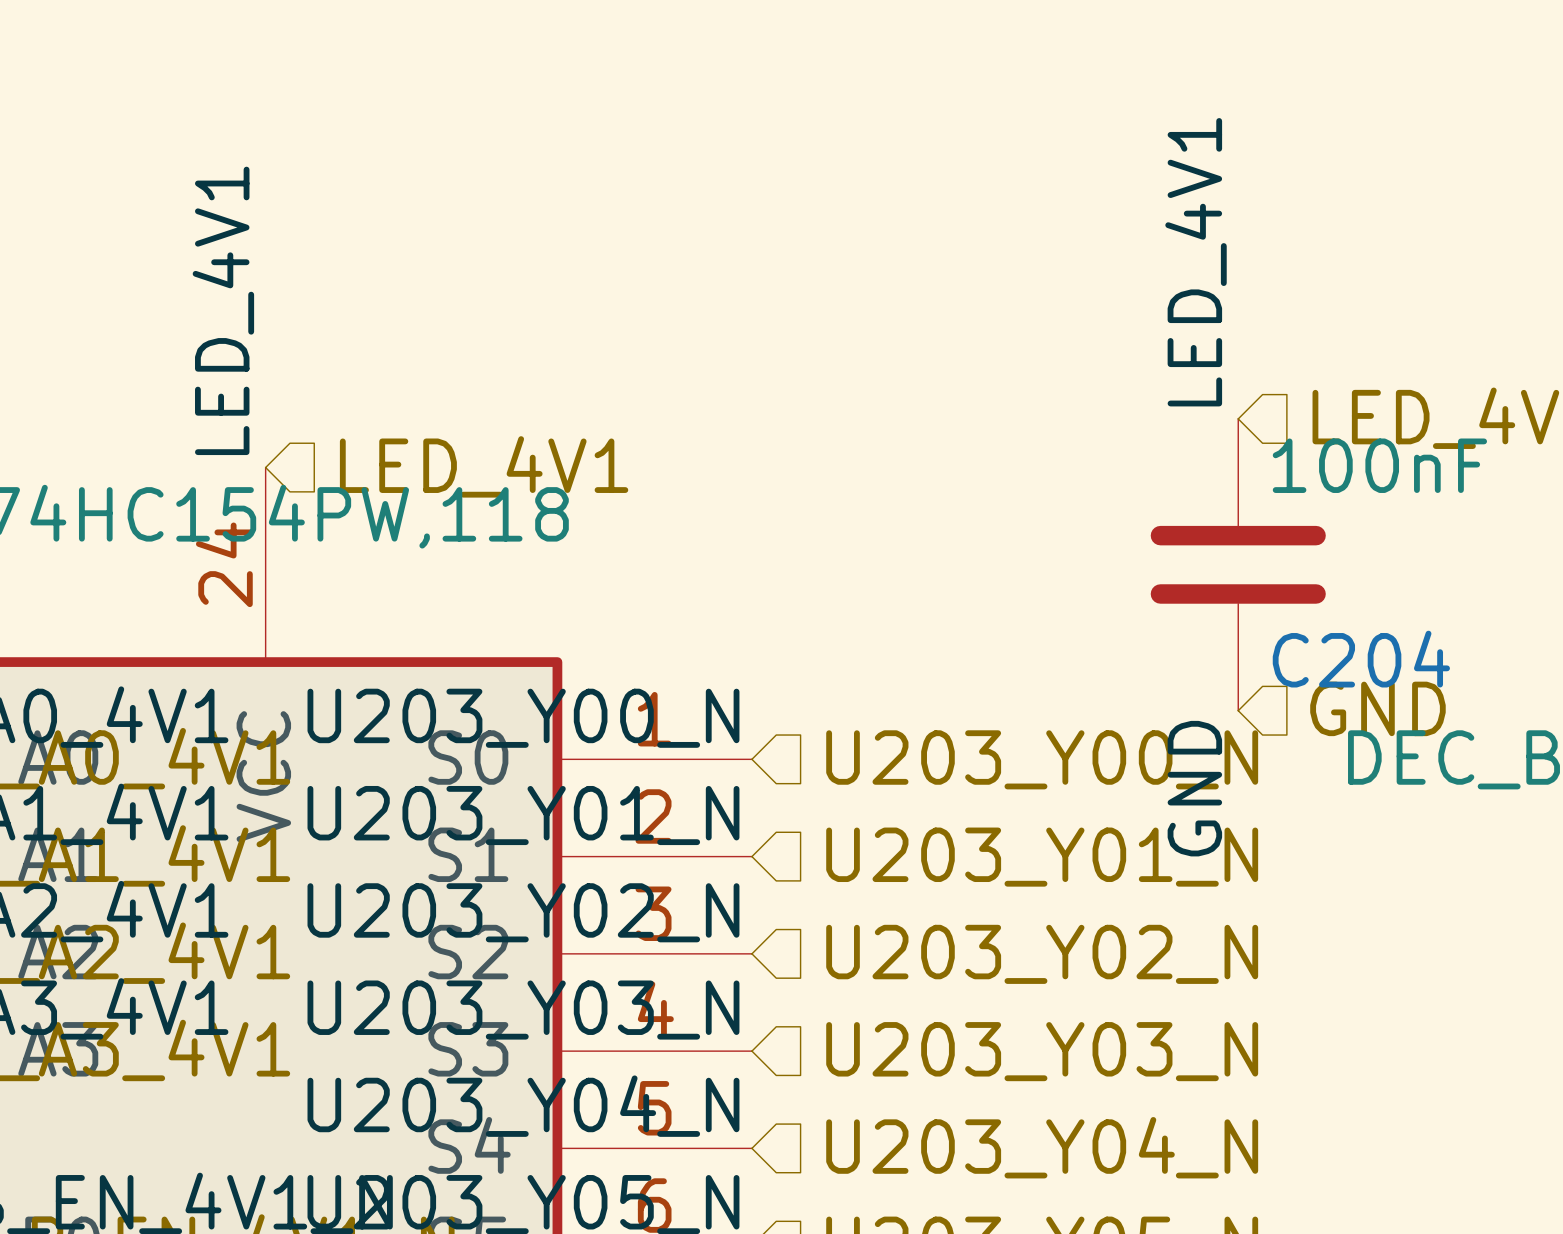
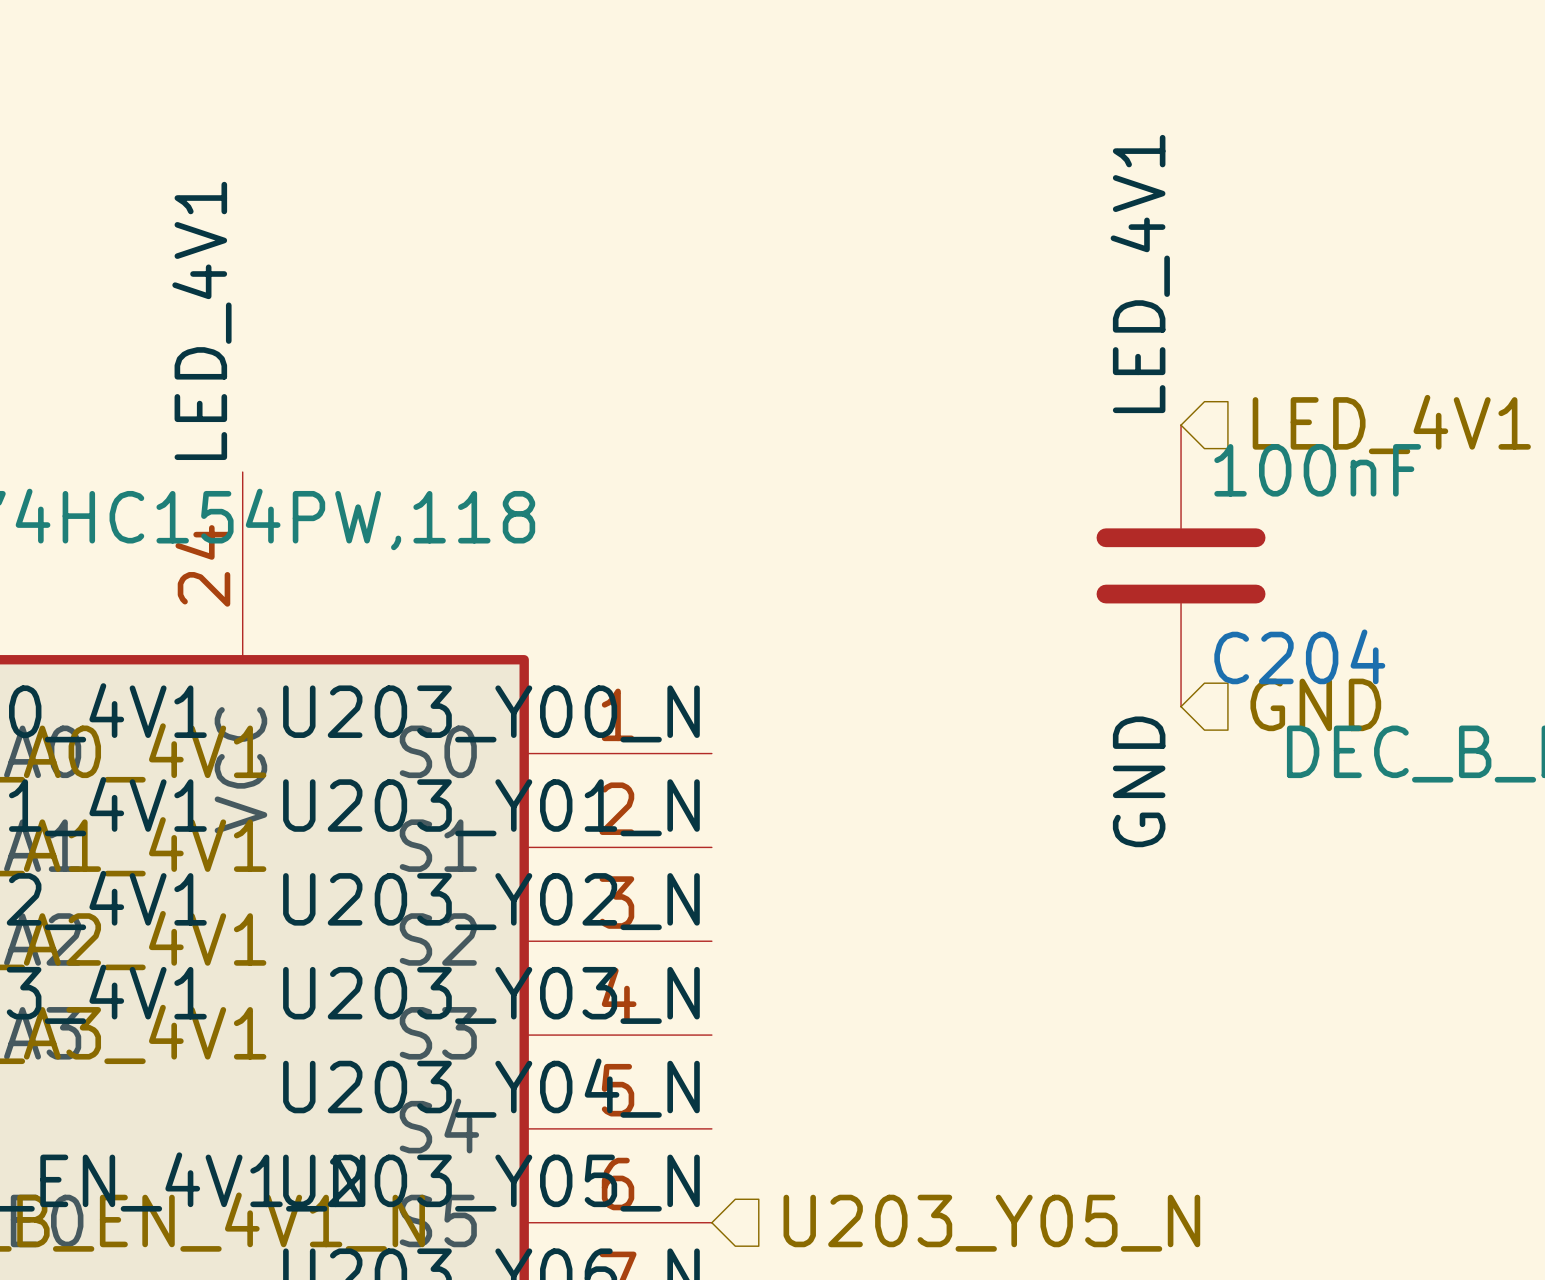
hierarchical label: LED_4V1 (484, 466) -> none
hierarchical label: U203_Y00_N (1042, 759) -> none
hierarchical label: U203_Y01_N (1042, 857) -> none
hierarchical label: U203_Y02_N (1042, 954) -> none
hierarchical label: U203_Y03_N (1042, 1051) -> none
hierarchical label: U203_Y04_N (1042, 1147) -> none

